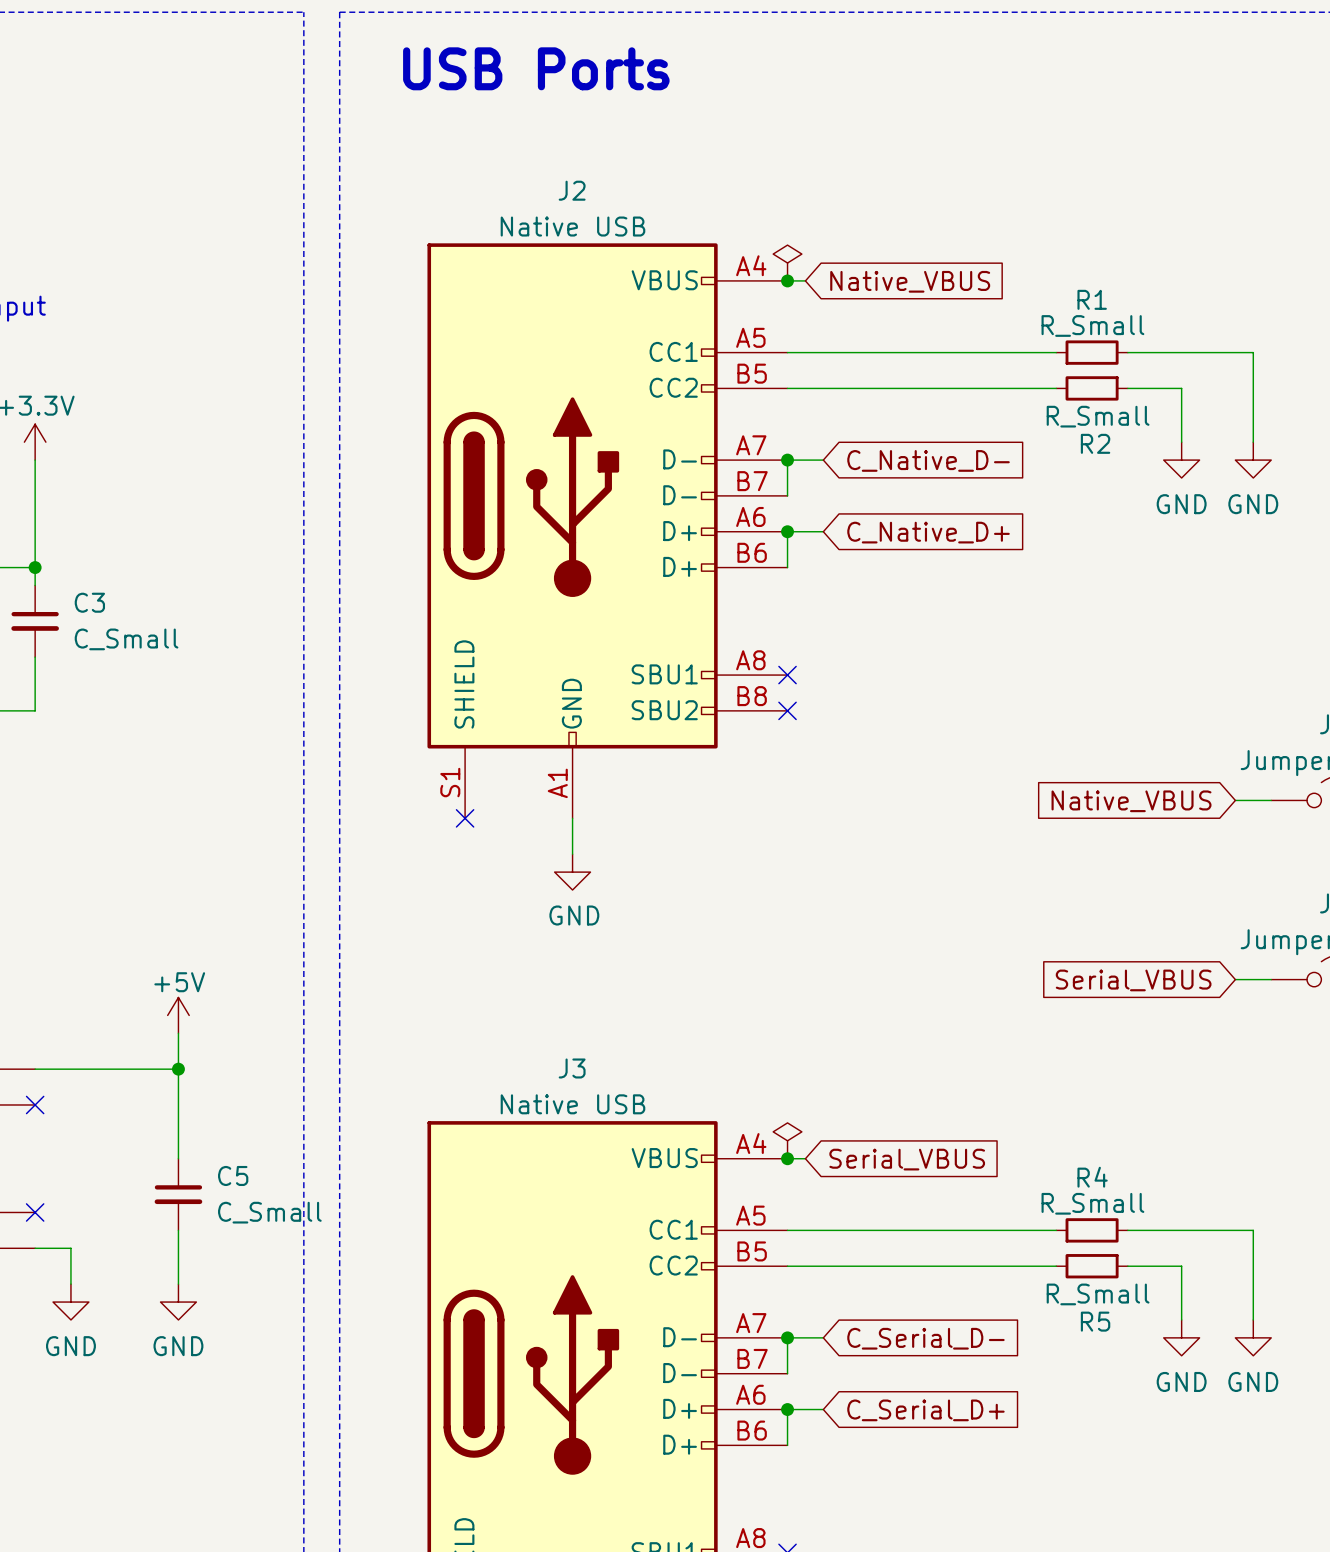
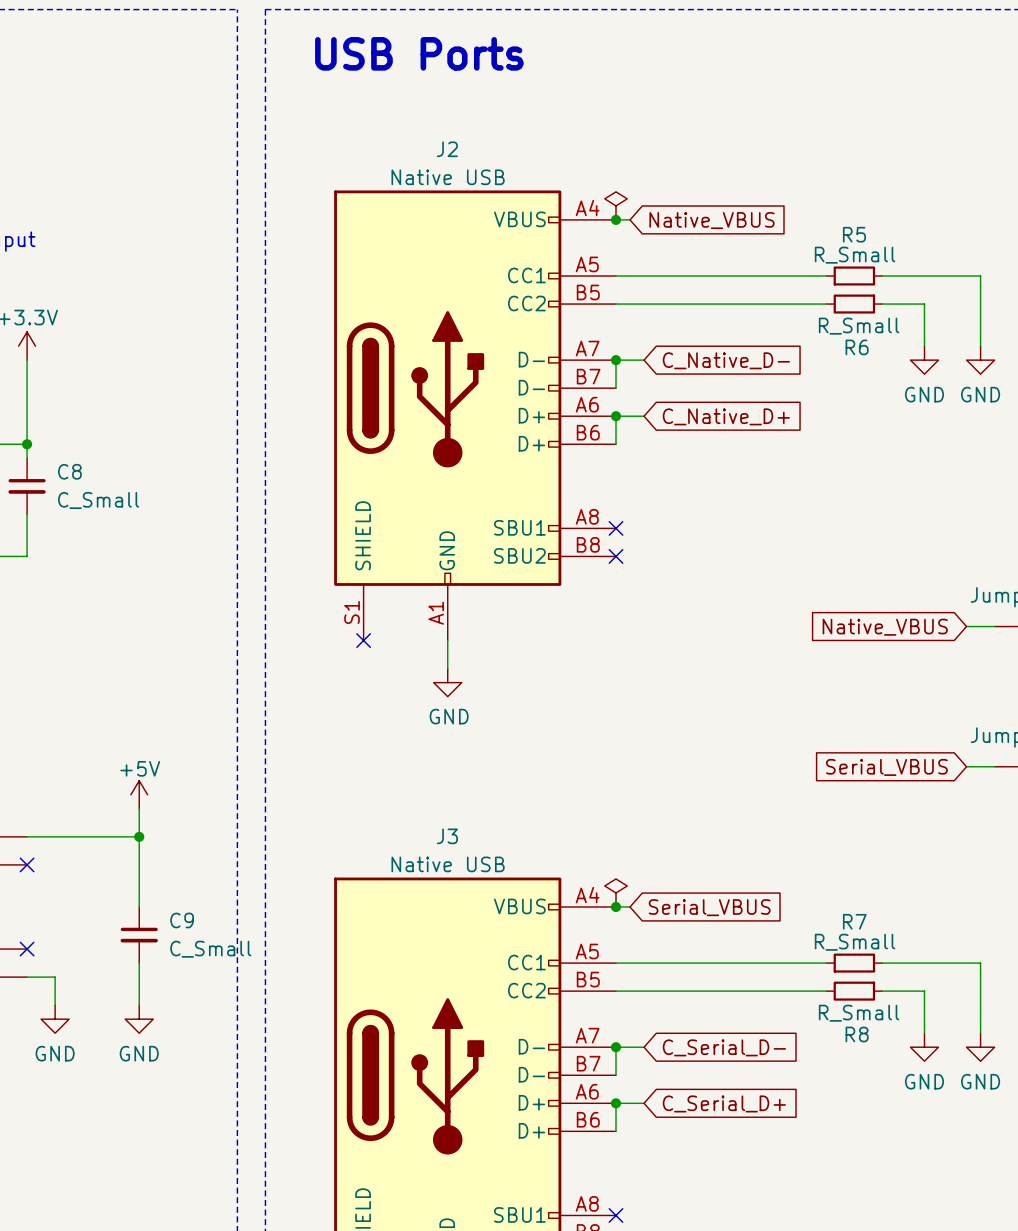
R1 name: R1 (1092, 299) -> R5 (854, 234)
R2 name: R2 (1095, 443) -> R6 (857, 347)
C3 name: C3 (89, 602) -> C8 (69, 471)
C5 name: C5 (233, 1175) -> C9 (182, 920)
R4 name: R4 (1092, 1177) -> R7 (854, 921)
R5 name: R5 (1095, 1321) -> R8 (857, 1034)

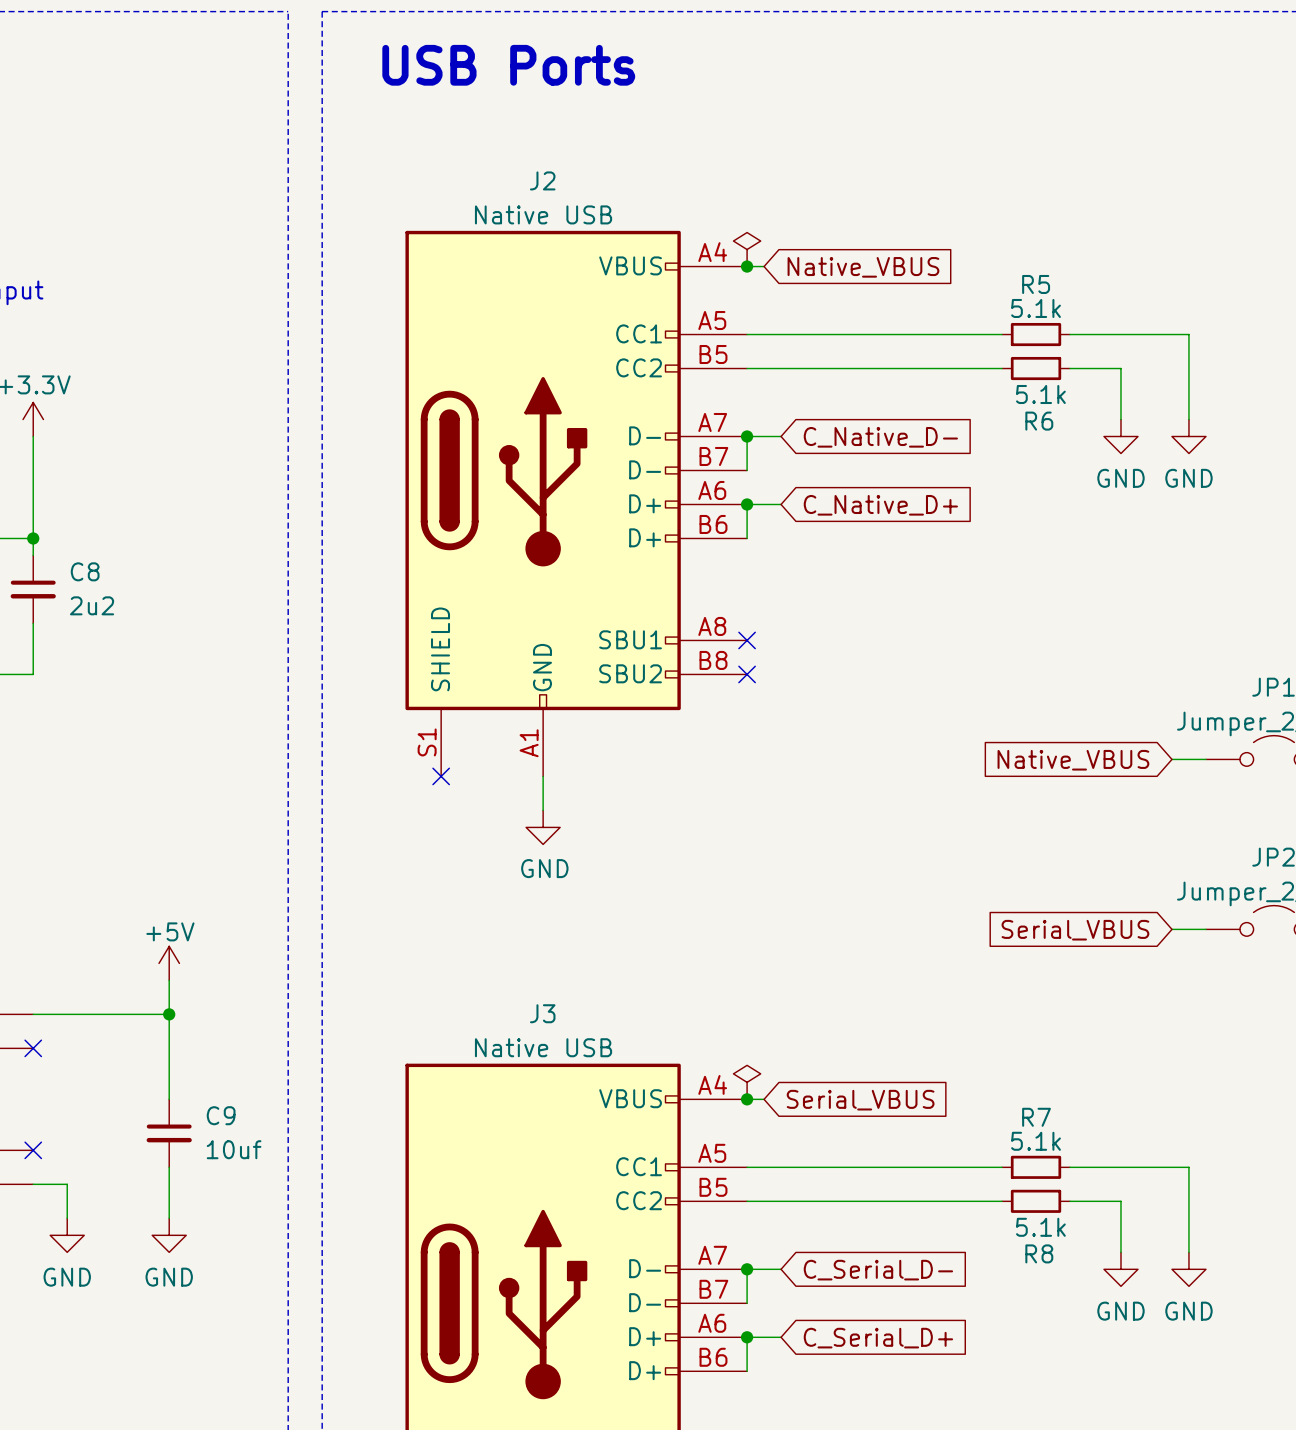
R5 value: R_Small (855, 255) -> 5.1k (1036, 308)
R6 value: R_Small (859, 326) -> 5.1k (1040, 394)
C8 value: C_Small (98, 500) -> 2u2 (92, 605)
R7 value: R_Small (855, 942) -> 5.1k (1036, 1141)
C9 value: C_Small (210, 949) -> 10uf (234, 1149)
R8 value: R_Small (859, 1013) -> 5.1k (1040, 1227)

